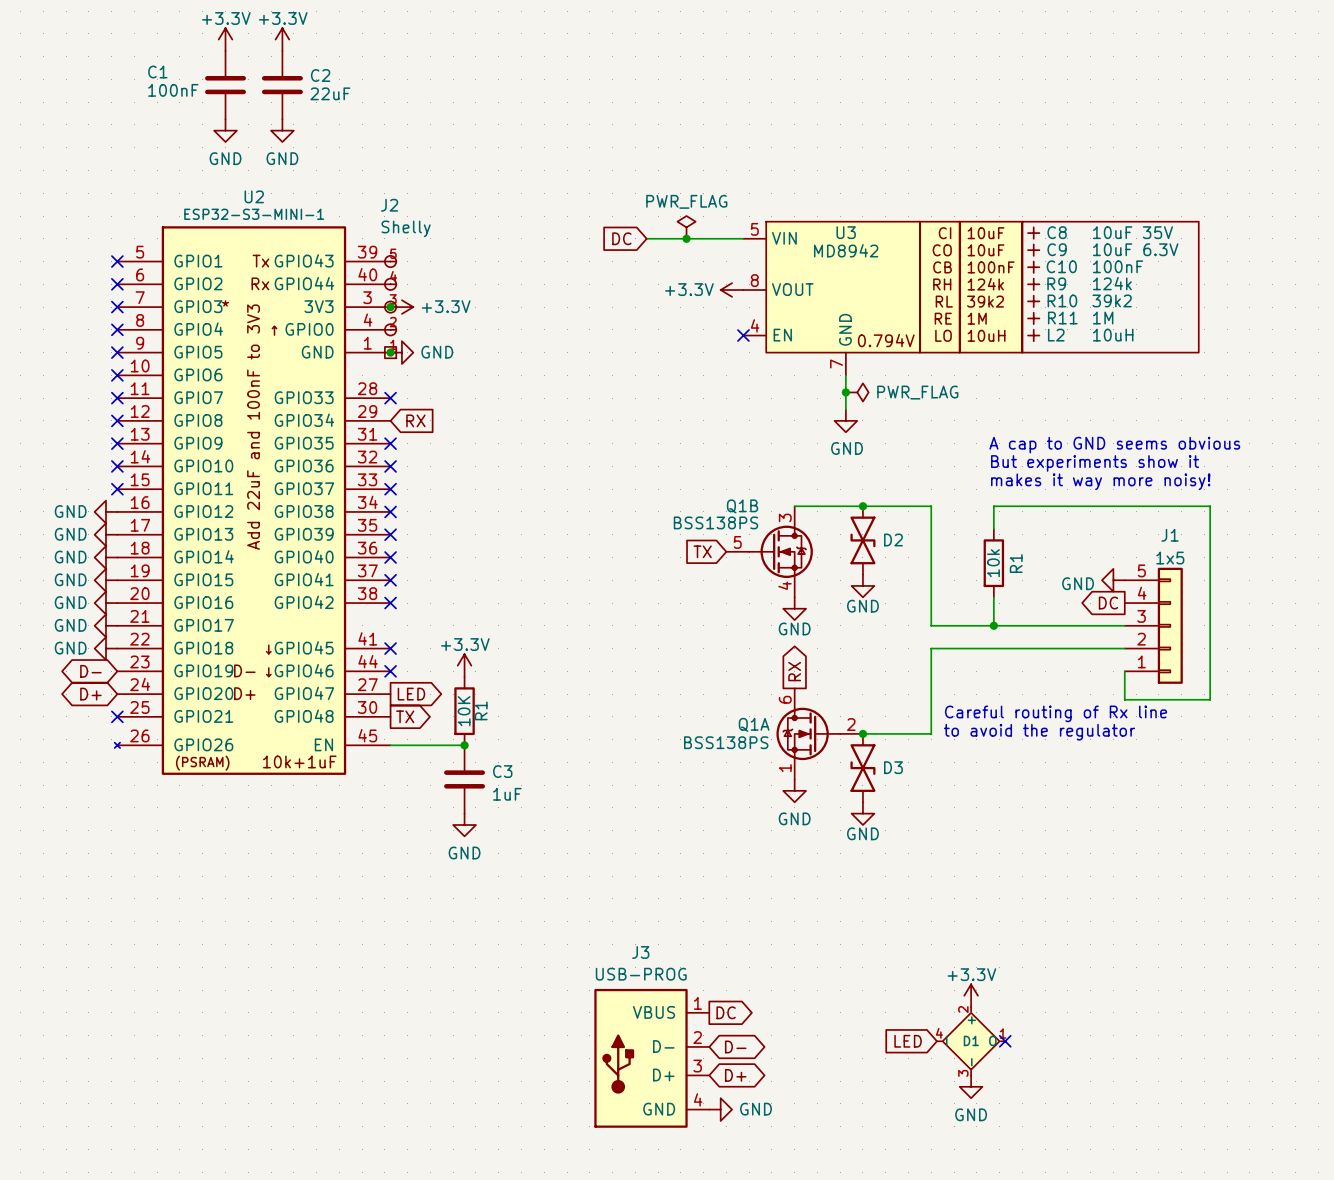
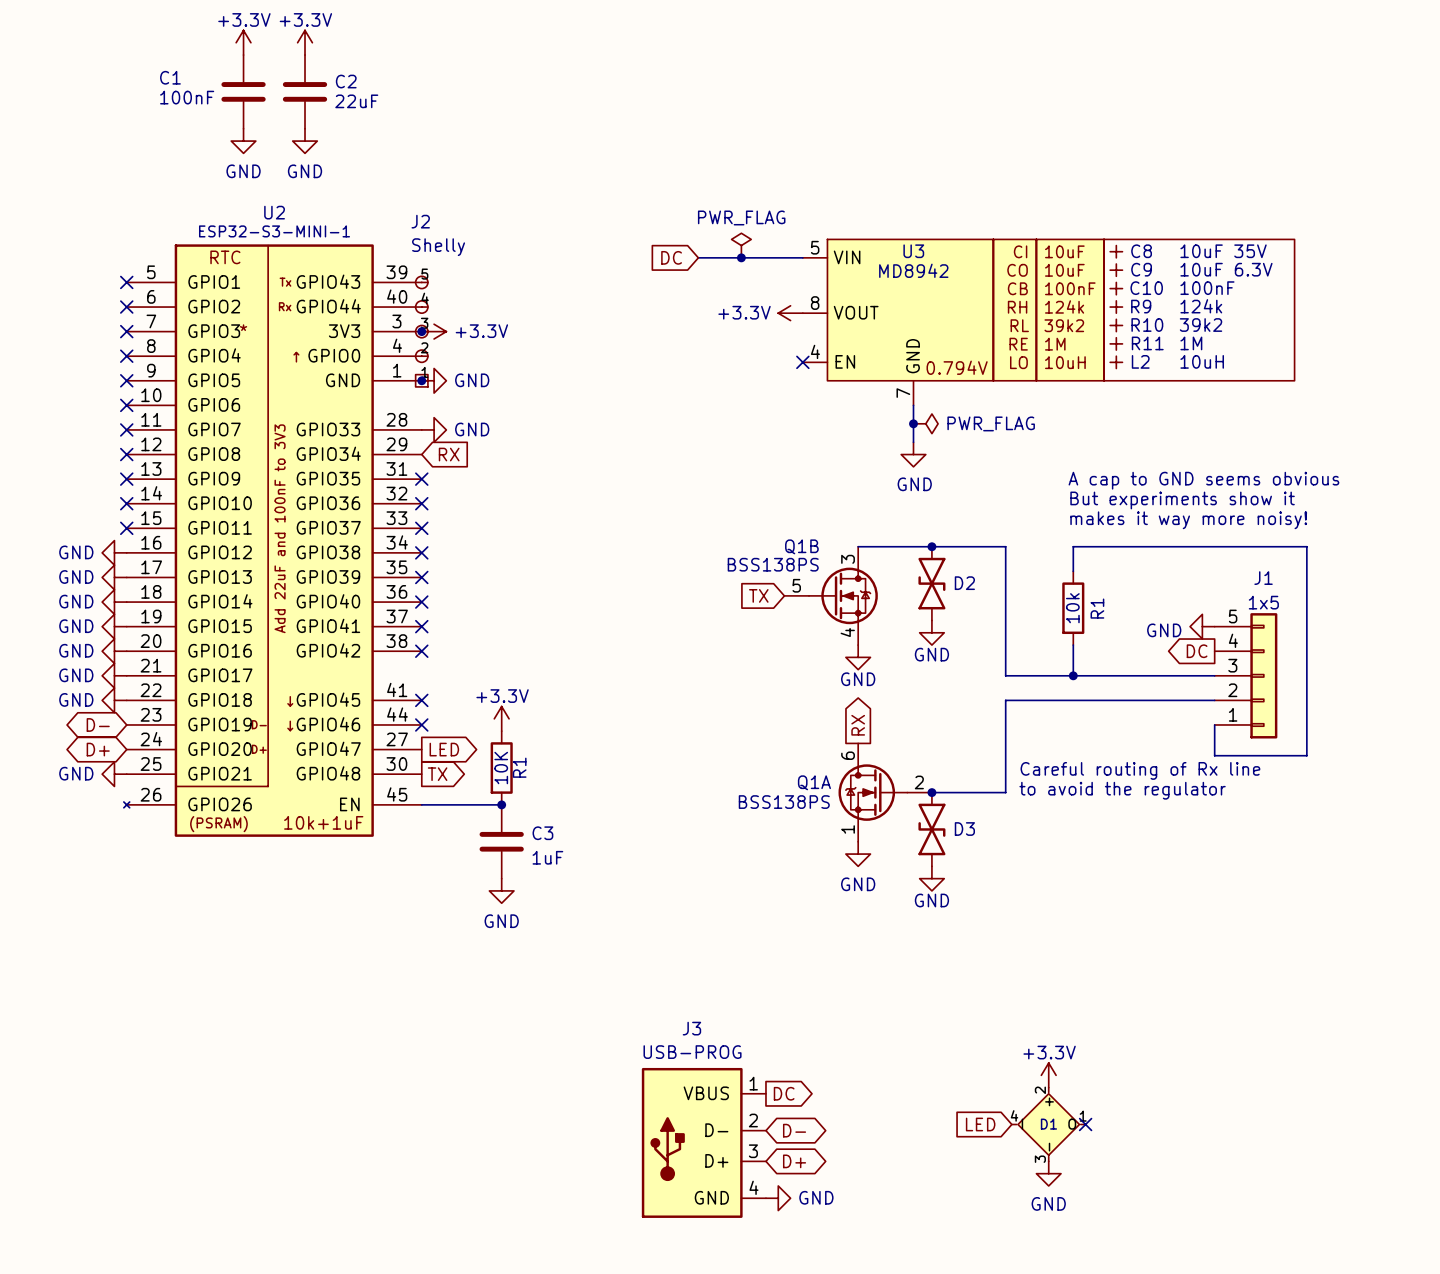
U2 symbol: [114, 226, 391, 775] -> [123, 244, 422, 837]
no-connect mark: (390, 398) -> none
power symbol: none -> GND (434, 429)
power symbol: none -> GND (114, 774)
no-connect mark: (117, 716) -> none

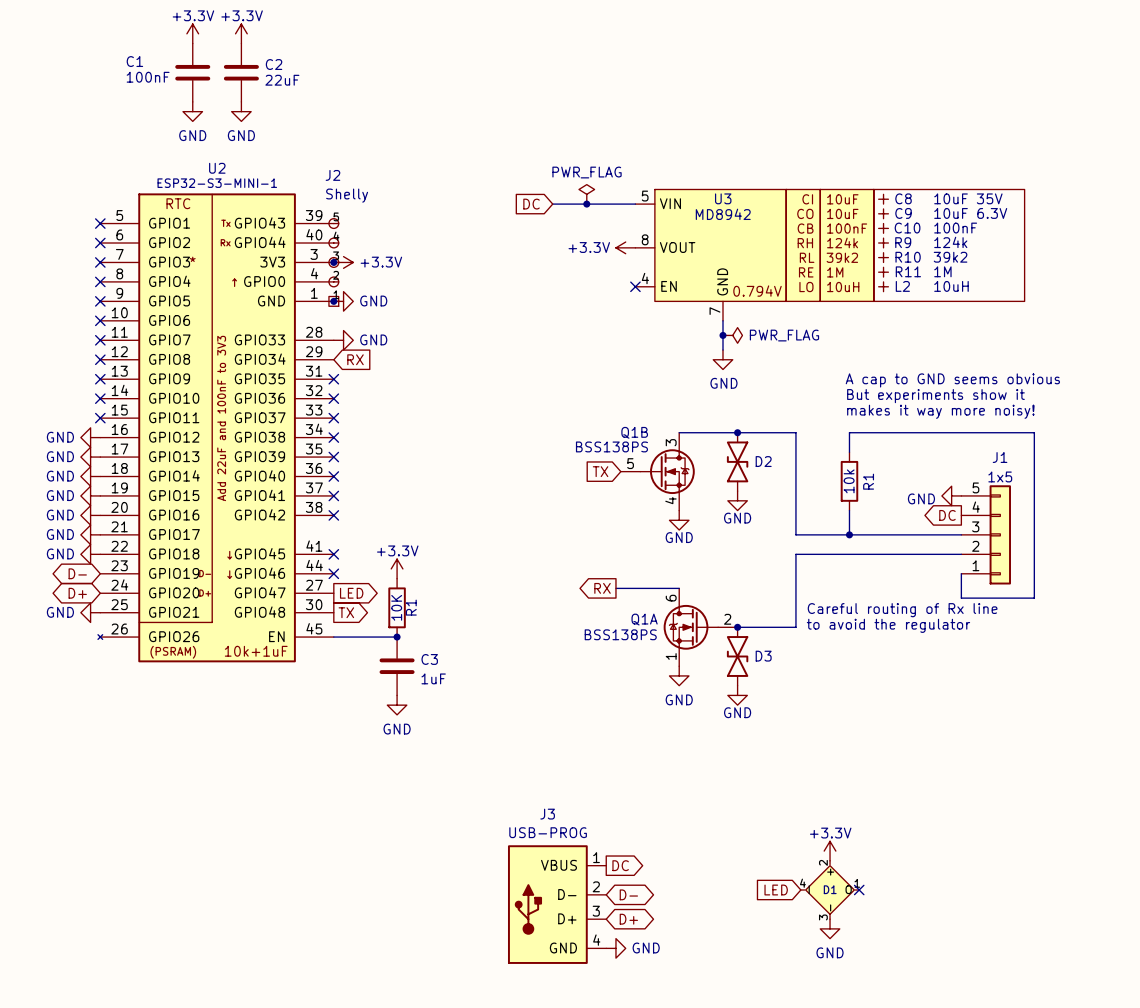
global label rotation: 0° (858, 725) -> 90° counterclockwise (602, 588)
global label position: RX (858, 725) -> RX (602, 588)
wire: none -> (615, 588) (679, 588)

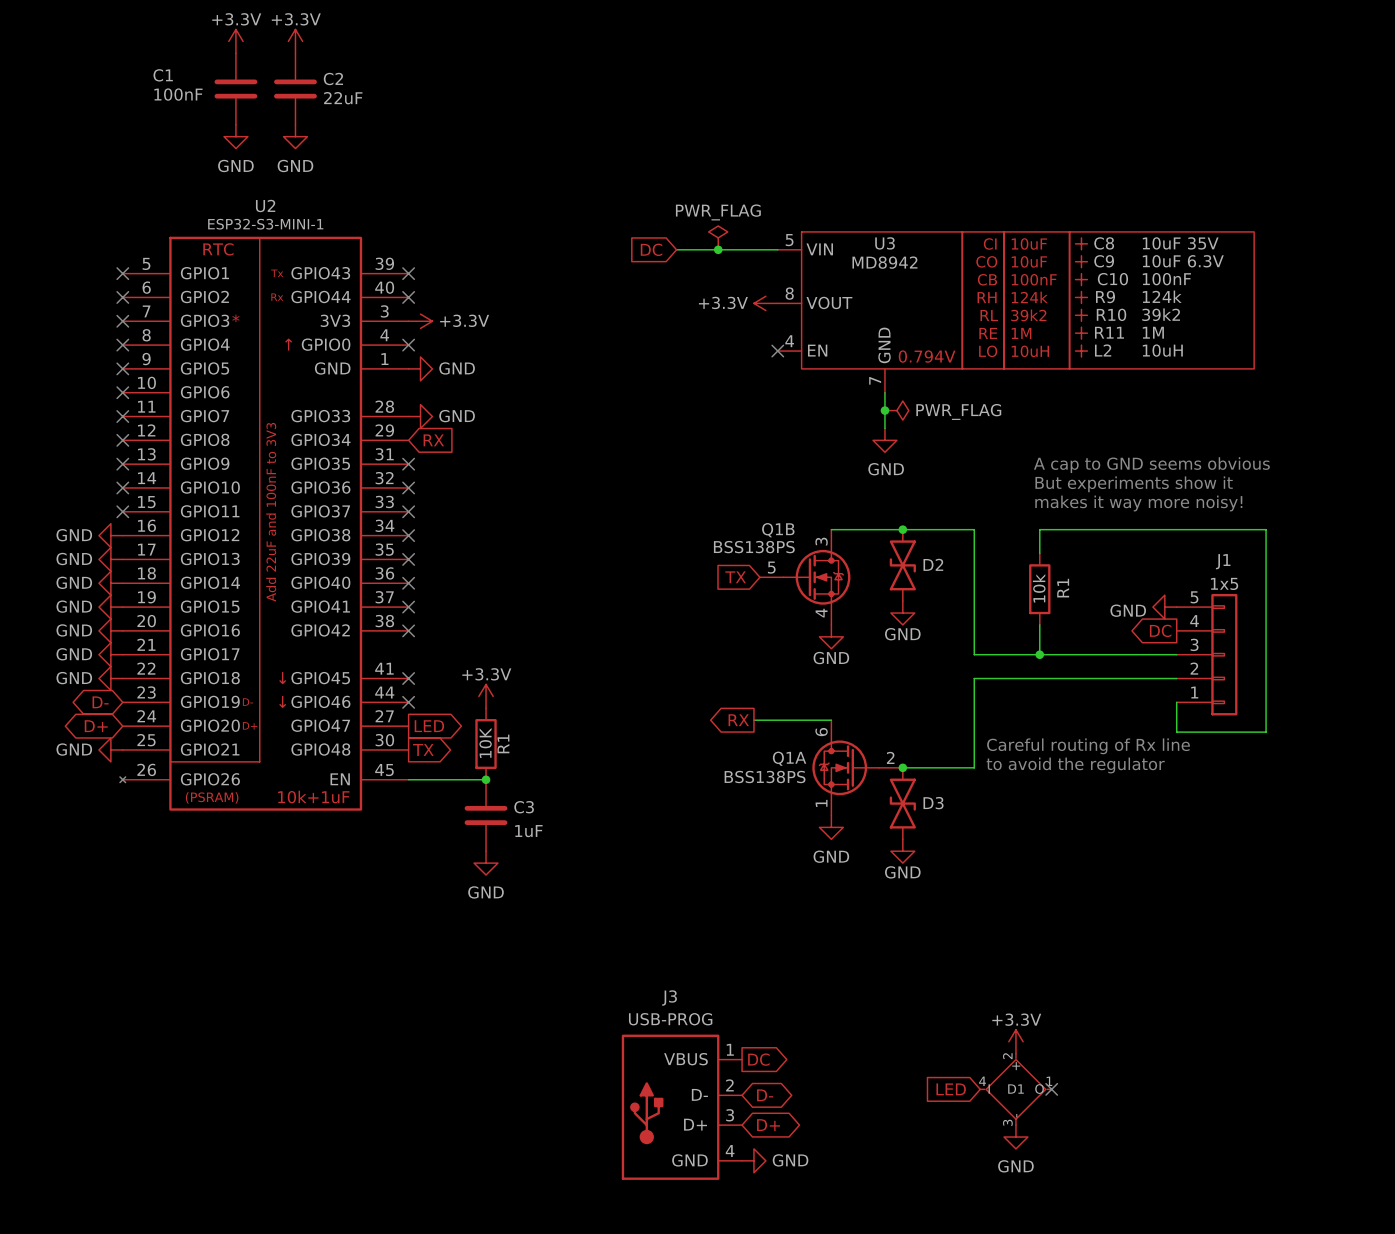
no-connect mark: none -> (408, 273)
no-connect mark: none -> (408, 297)
junction: (333, 262) -> none
J2: Shelly (333, 262) -> none
no-connect mark: none -> (408, 345)
junction: (333, 301) -> none

